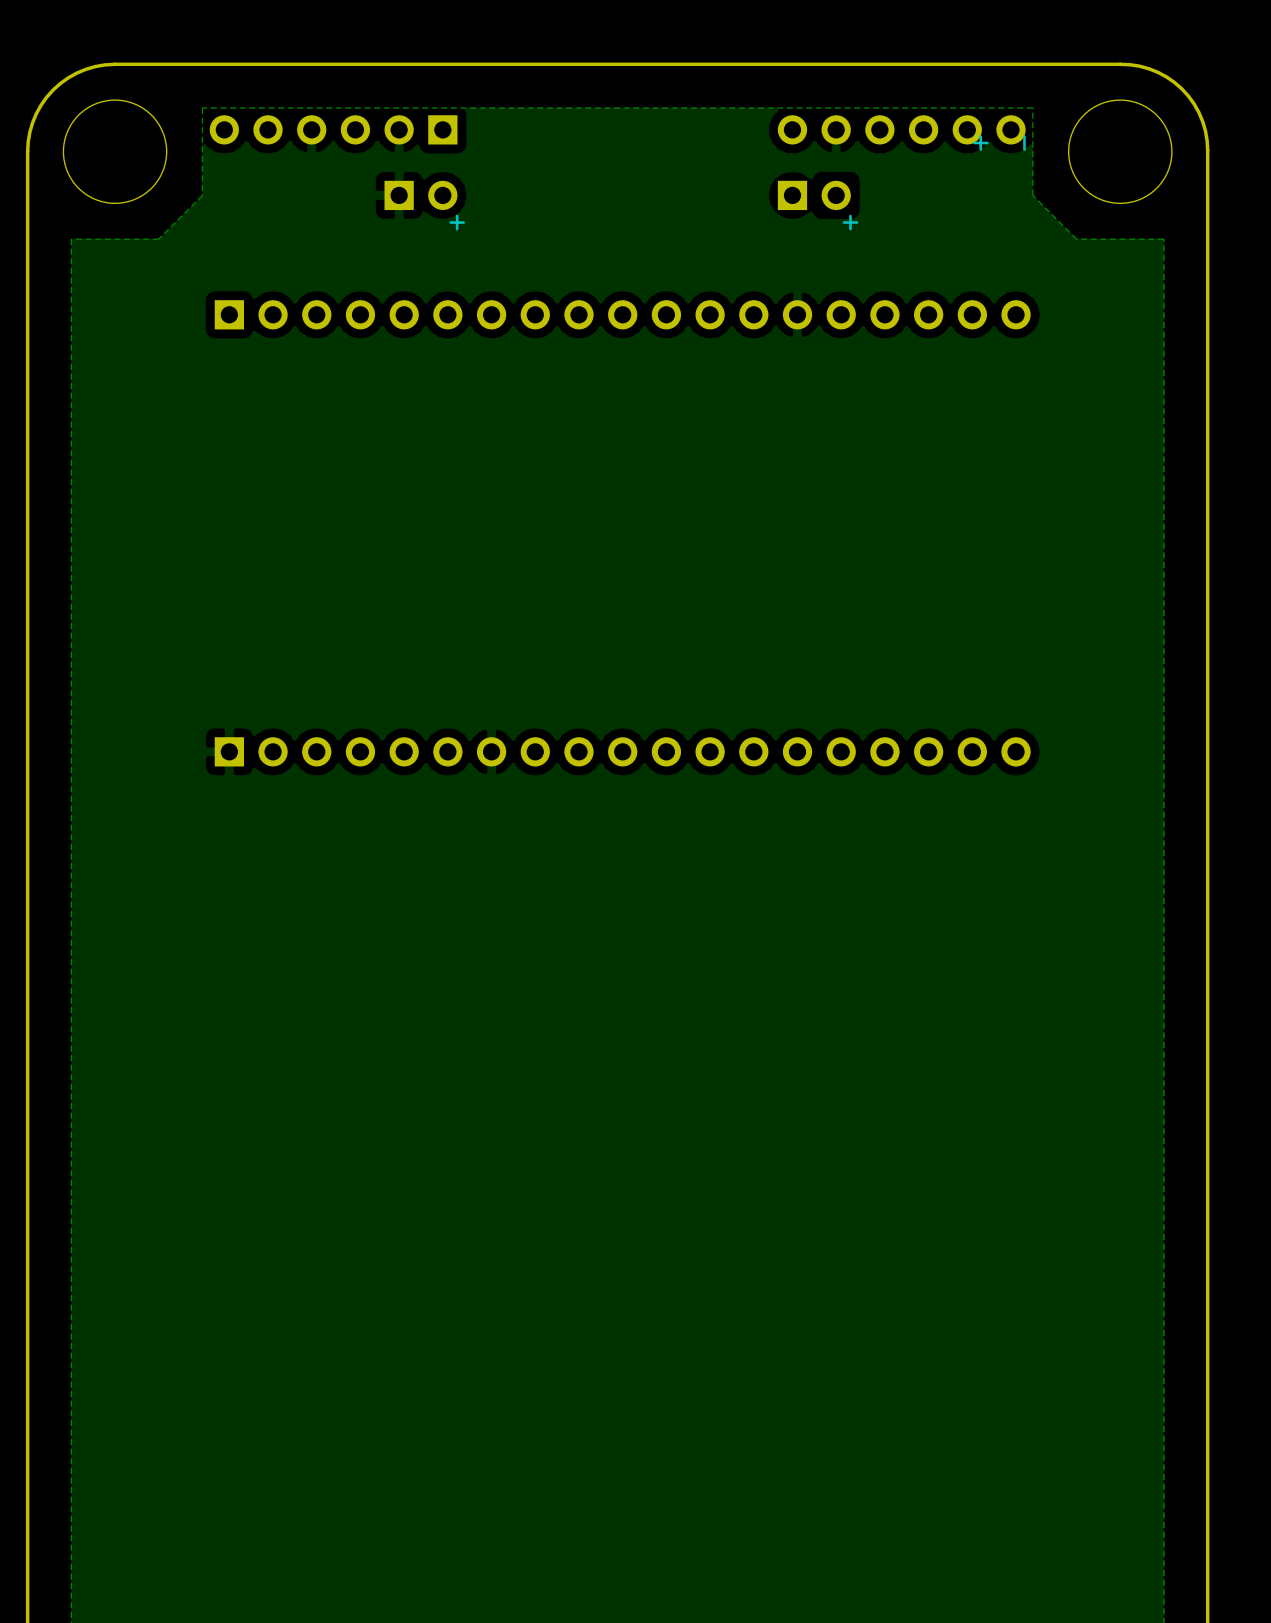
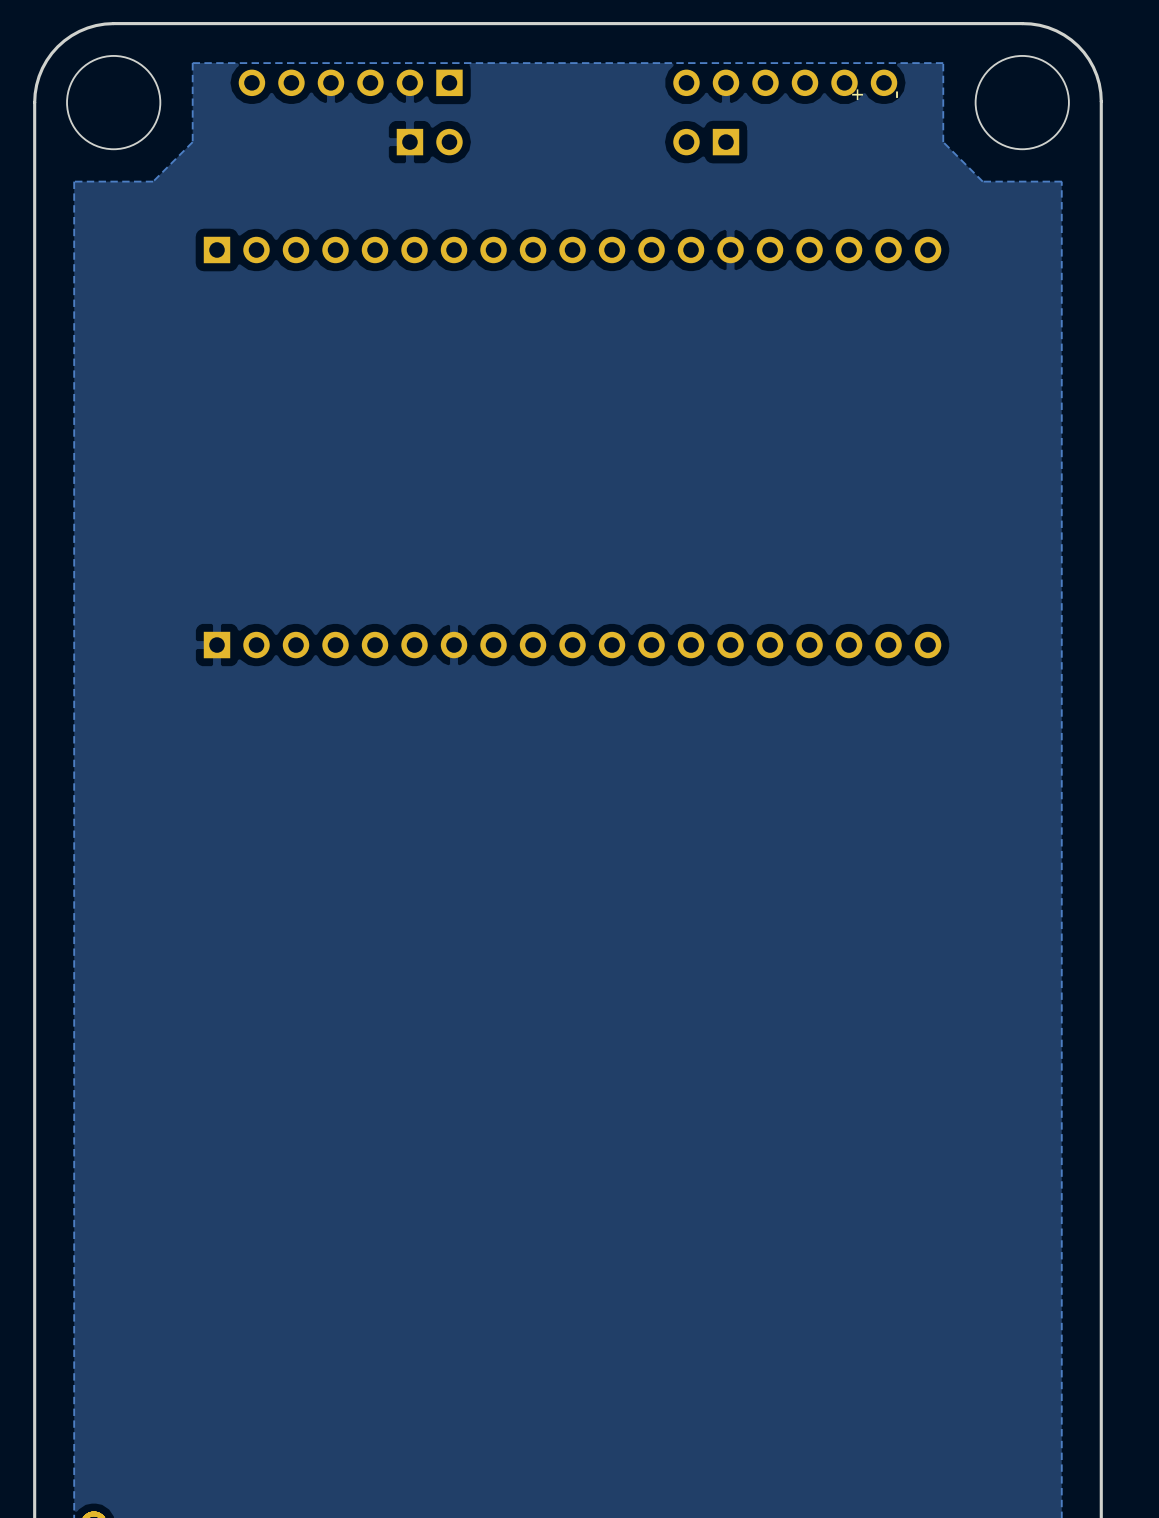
part position: (333, 129) -> (350, 82)
part position: (901, 129) -> (785, 82)
part: (420, 195) -> none
part: none -> (429, 142)
part: none -> (706, 142)
part: (814, 195) -> none

